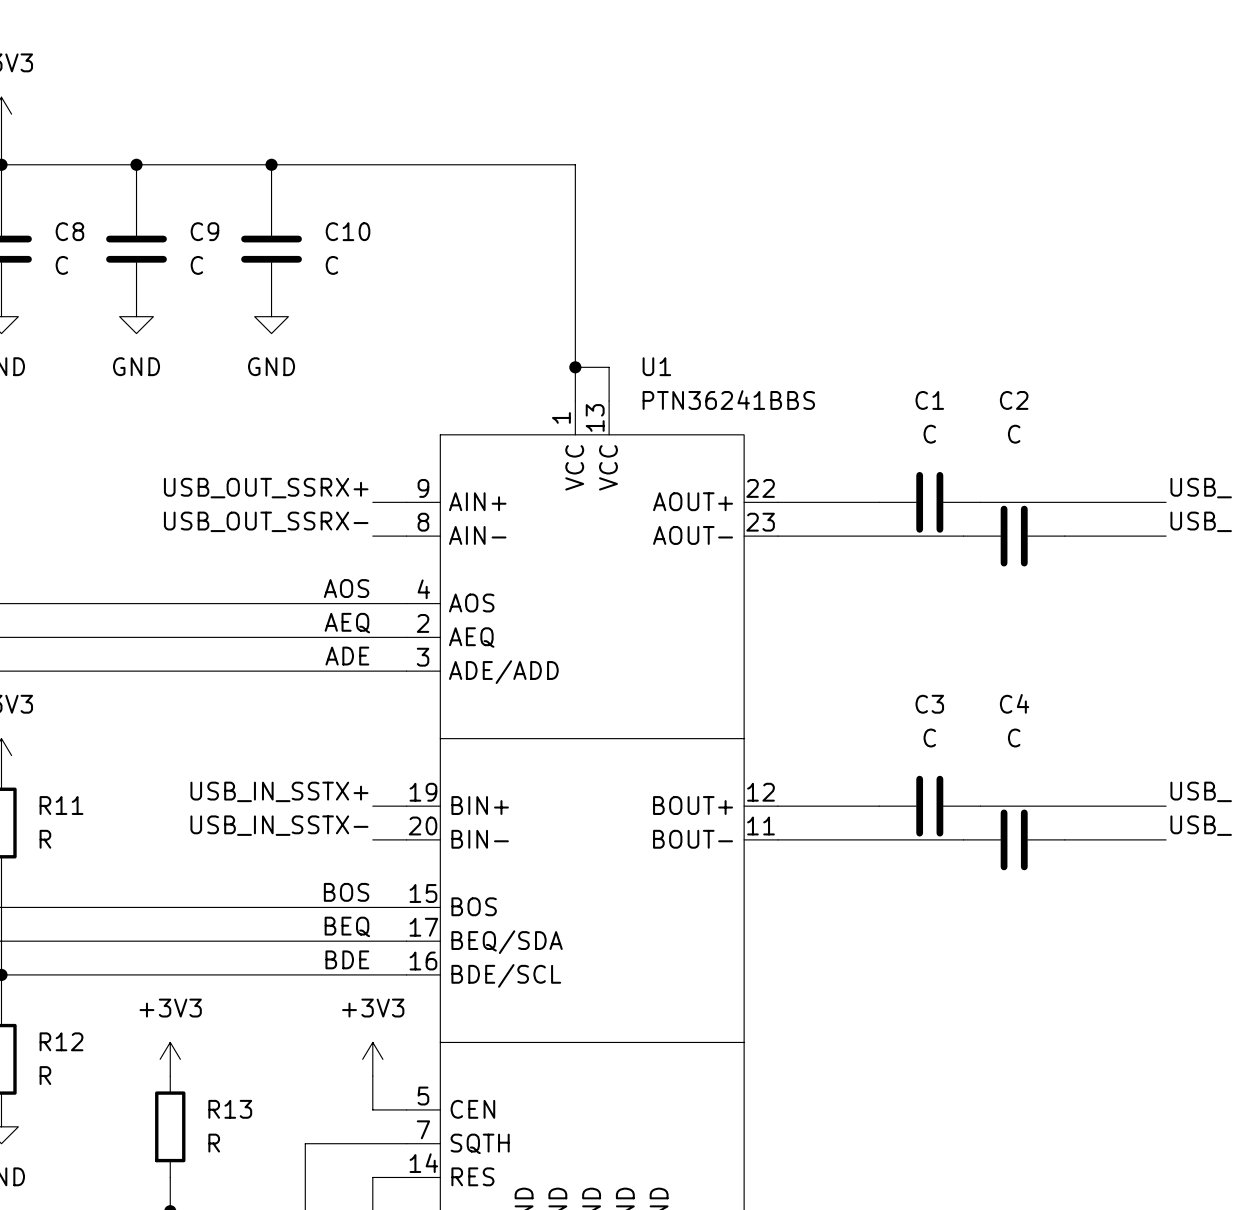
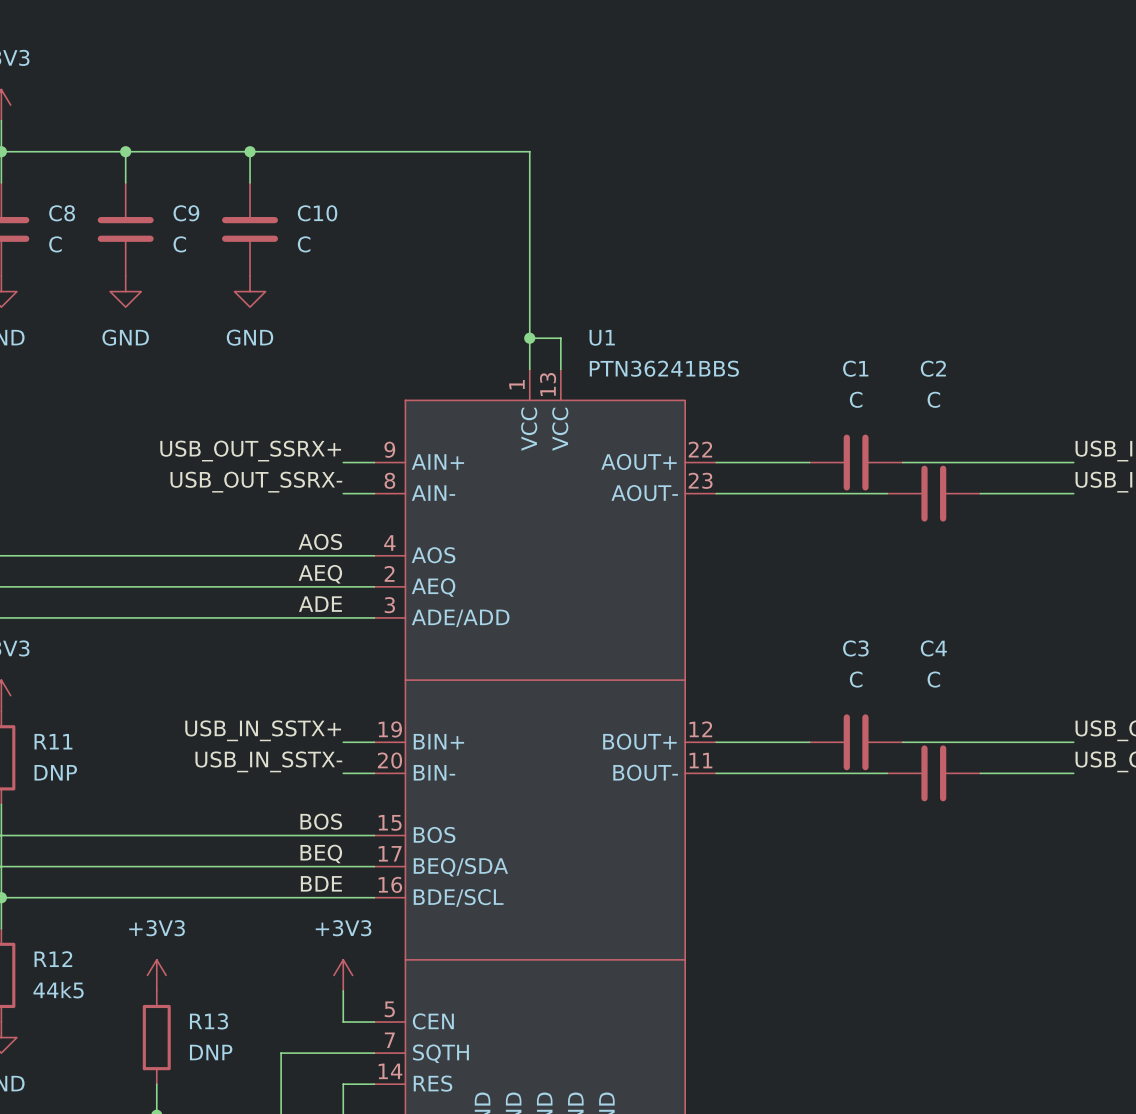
R11 value: R (45, 839) -> DNP (55, 772)
R12 value: R (45, 1075) -> 44k5 (58, 990)
R13 value: R (214, 1143) -> DNP (211, 1052)

